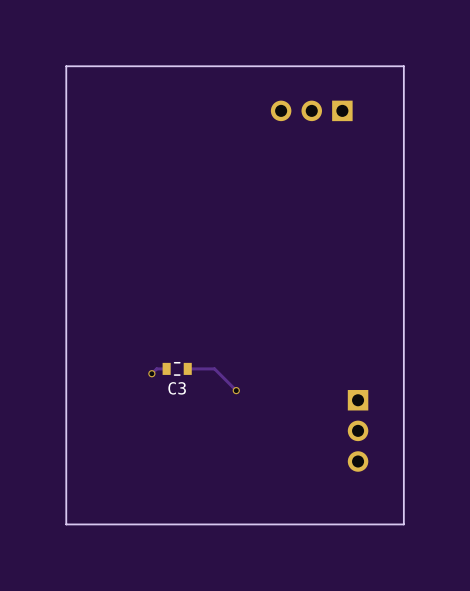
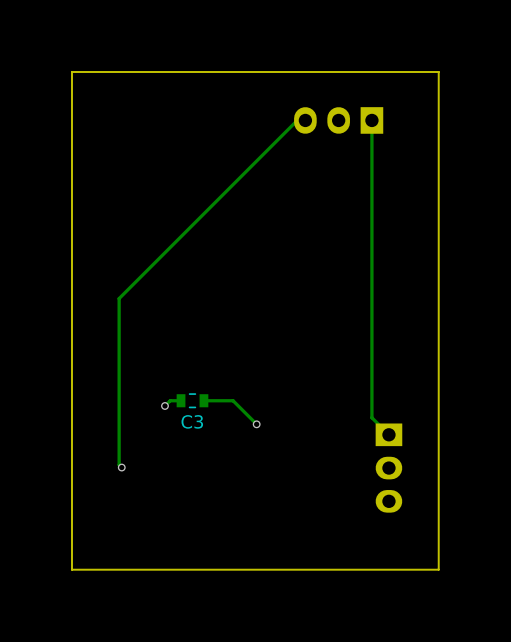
part footprint: [270, 100, 353, 122] -> [294, 107, 384, 134]
track: none -> (305, 120) (297, 120) (119, 298) (119, 464) (121, 467)
track: none -> (371, 120) (371, 417) (388, 434)
part footprint: [347, 390, 369, 472] -> [375, 423, 403, 513]
via: none -> (121, 467)

